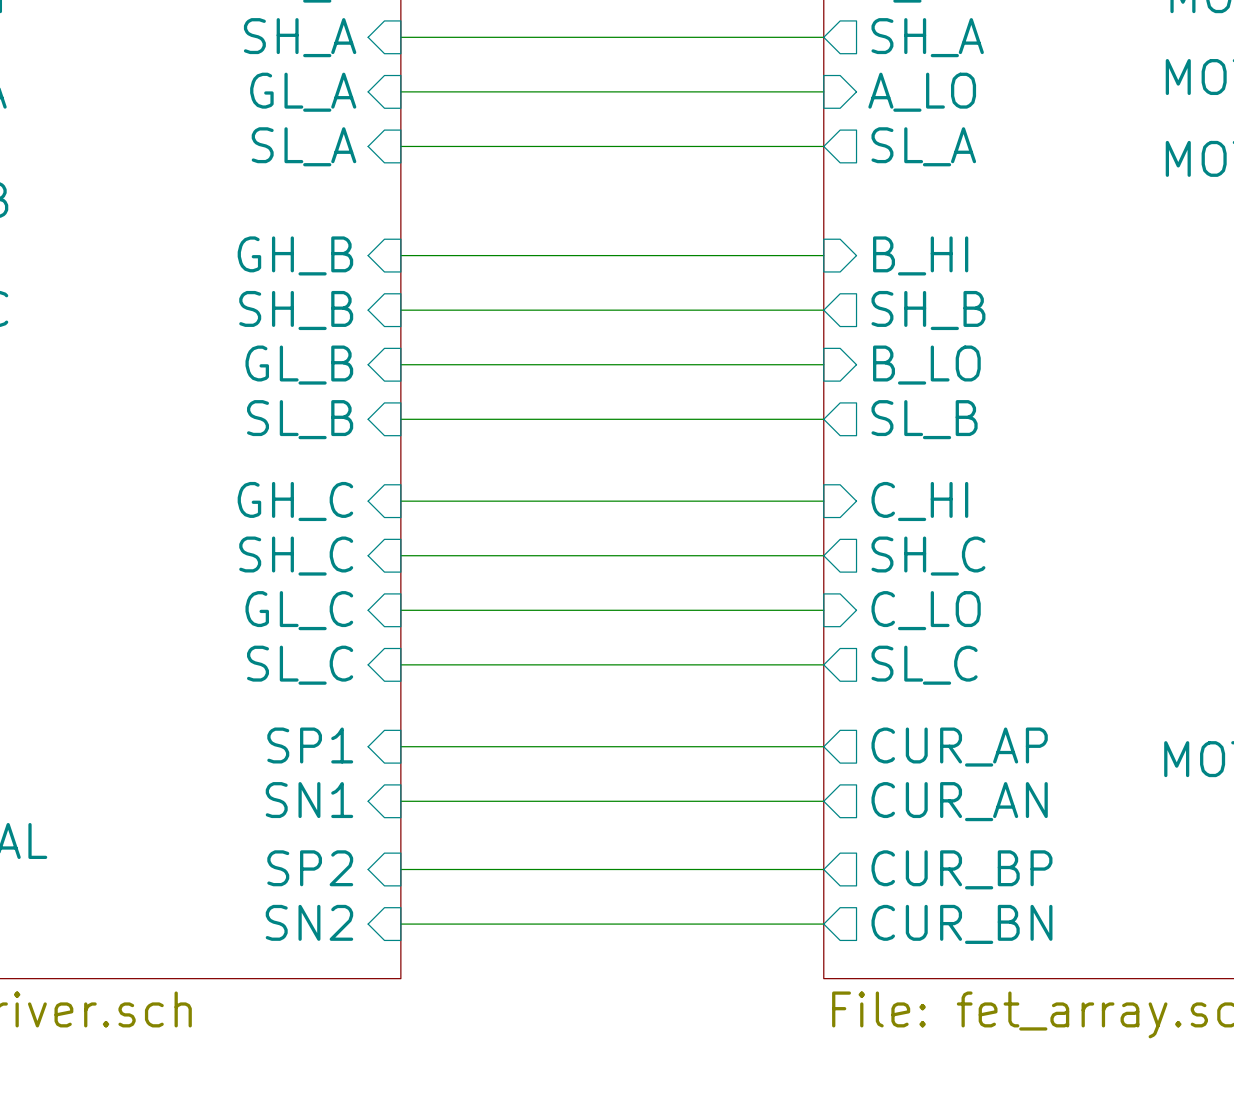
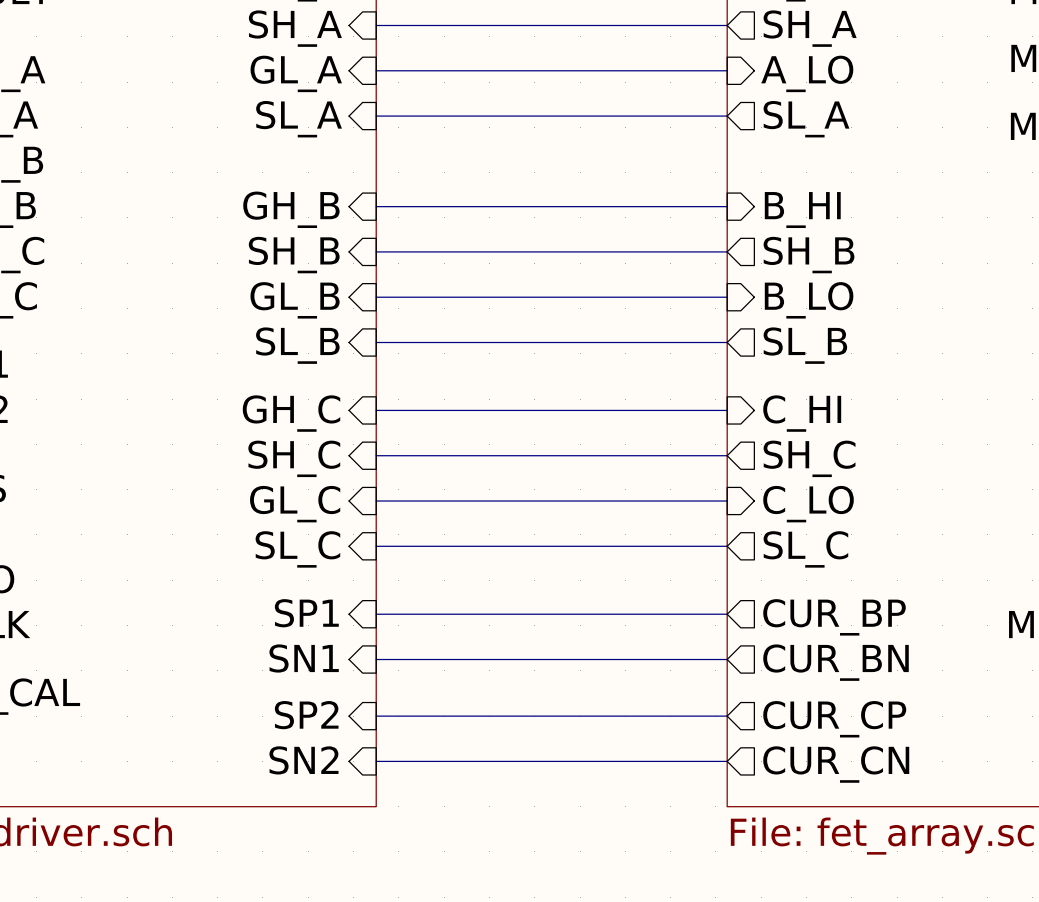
sheet pin: CUR_AP (959, 747) -> CUR_BP (834, 617)
sheet pin: CUR_AN (959, 801) -> CUR_BN (836, 662)
sheet pin: CUR_BP (961, 869) -> CUR_CP (834, 719)
sheet pin: CUR_BN (961, 924) -> CUR_CN (836, 764)

